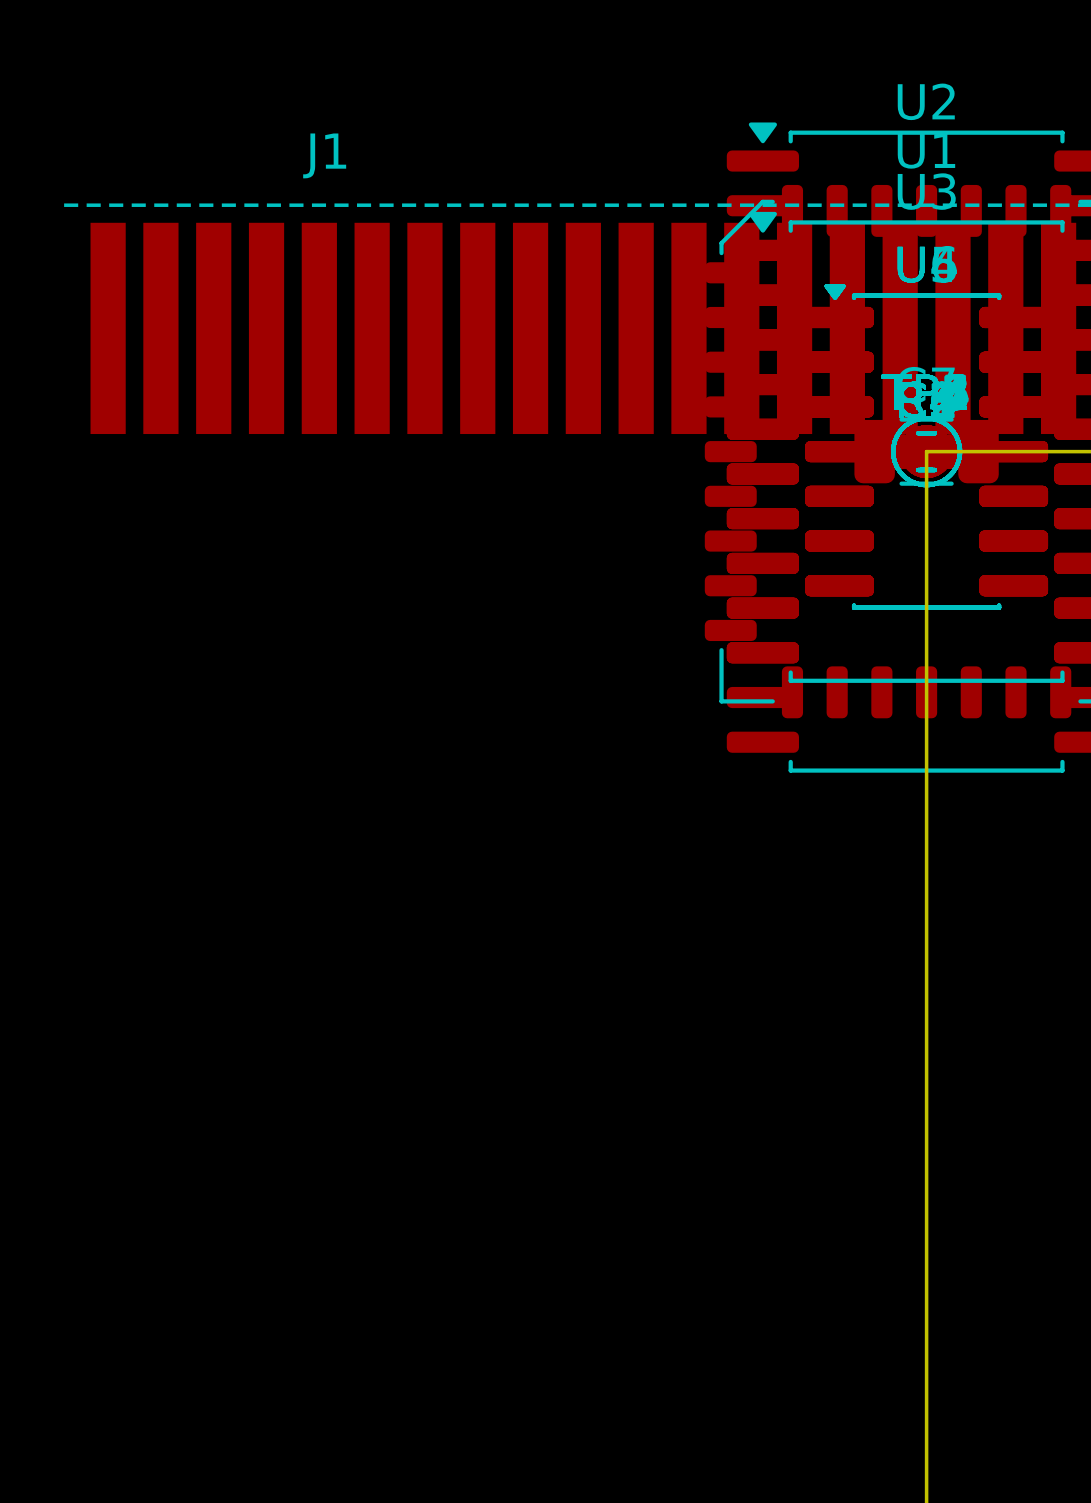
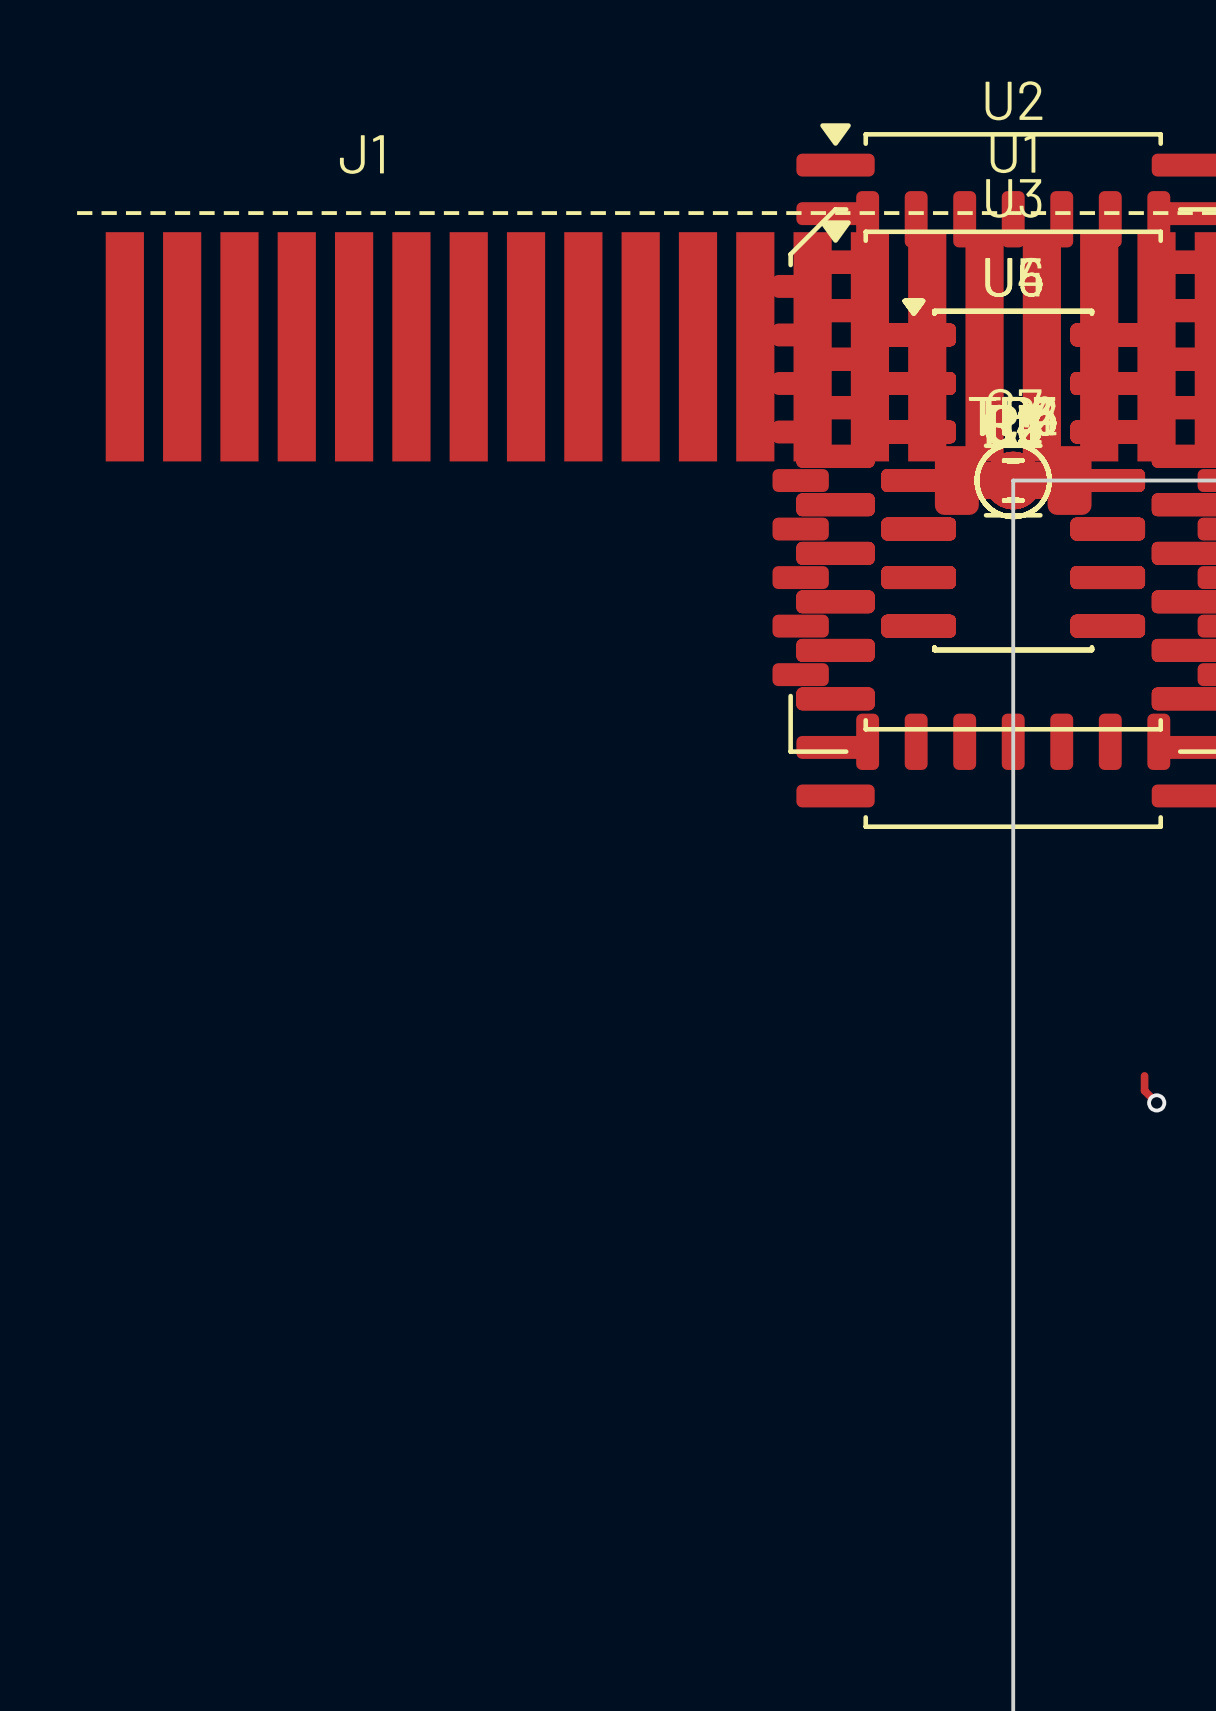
track: none -> (1144, 1075) (1144, 1090) (1156, 1102)
via: none -> (1156, 1102)

